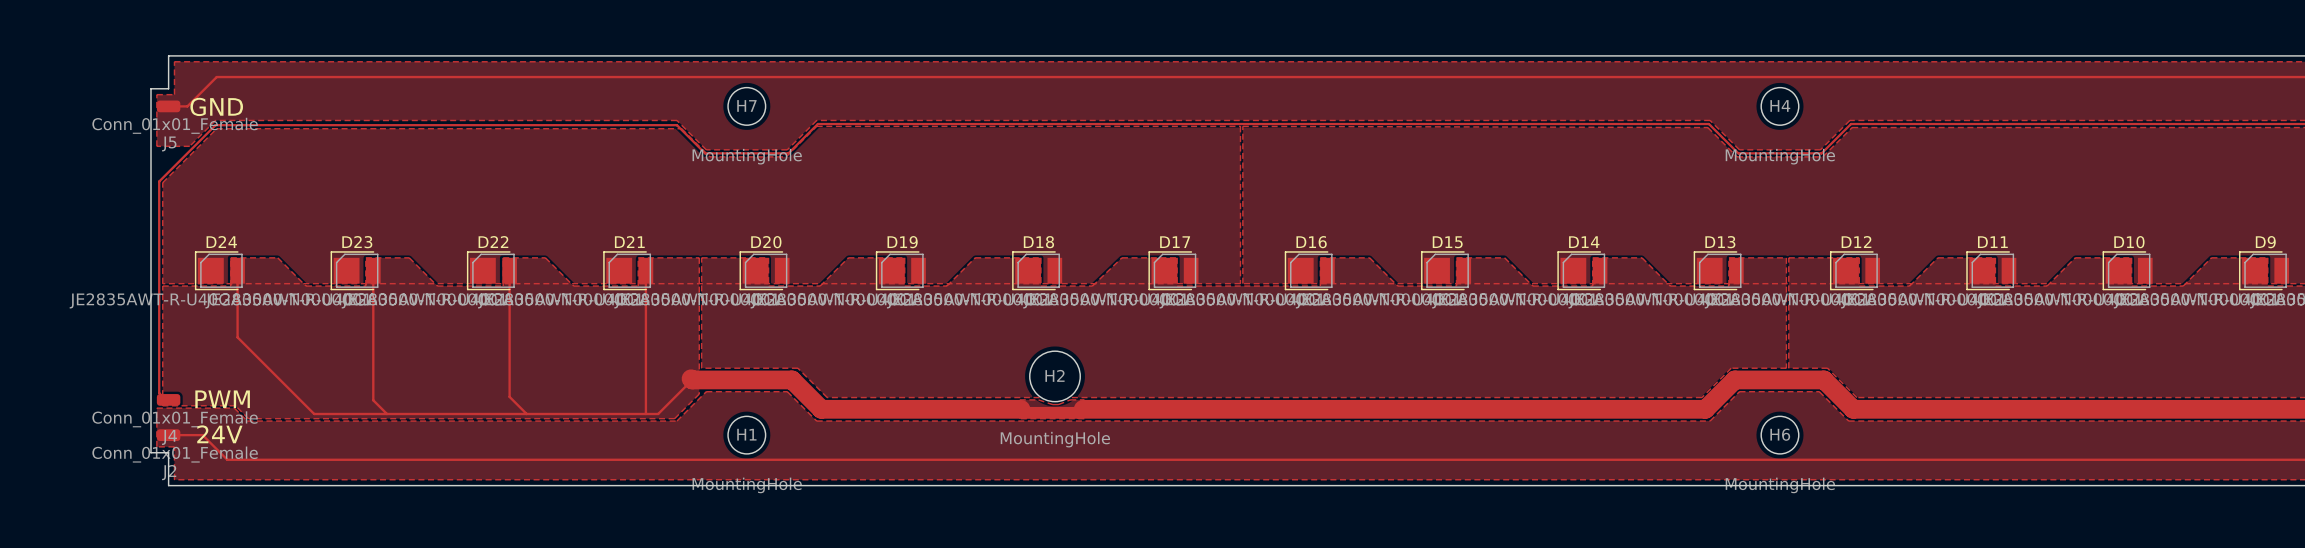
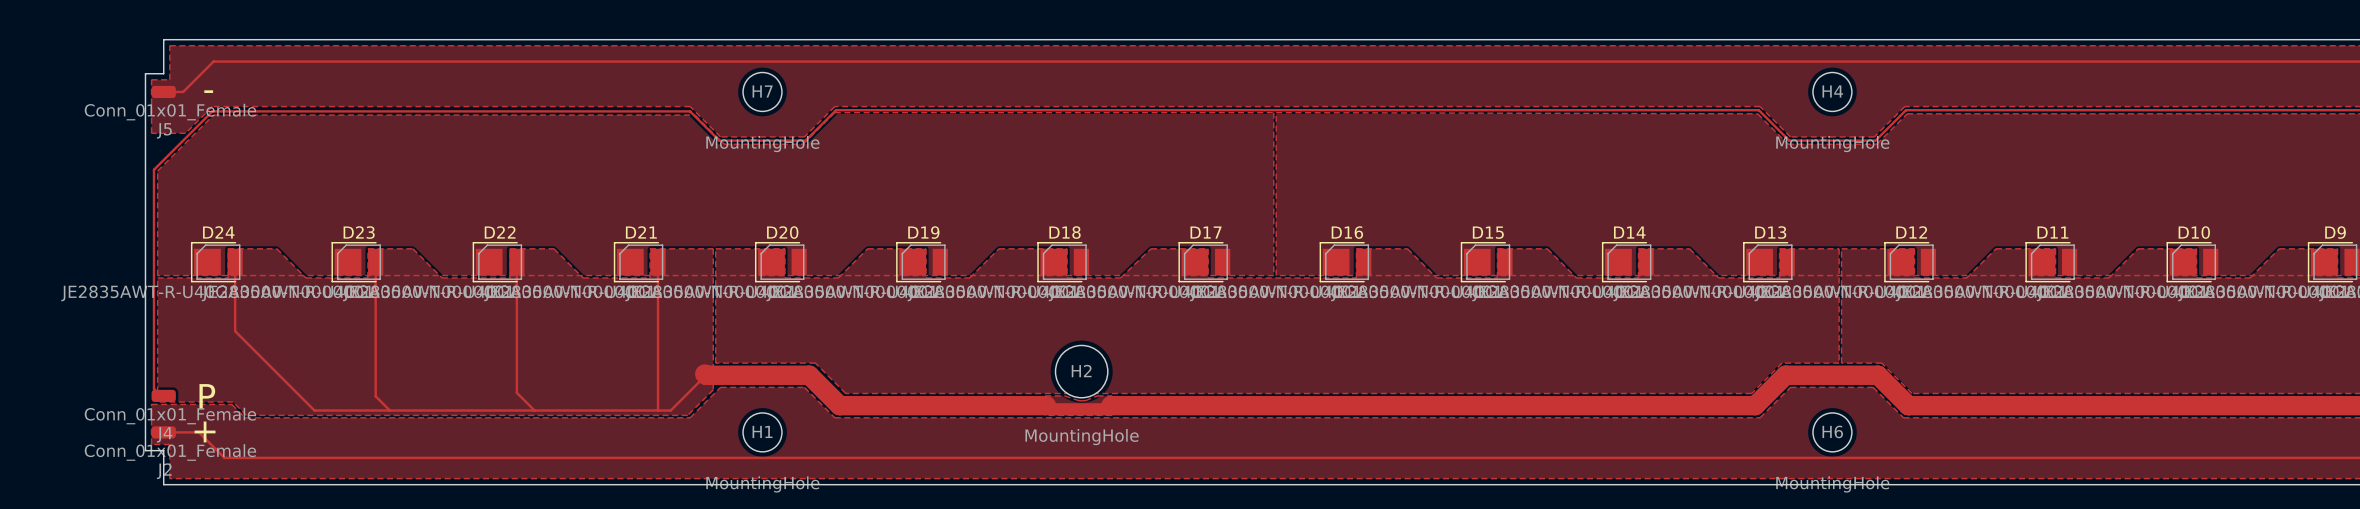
text: GND (216, 106) -> - (208, 91)
text: PWM (222, 399) -> none
text: none -> P (207, 396)
text: 24V (219, 434) -> + (205, 431)

